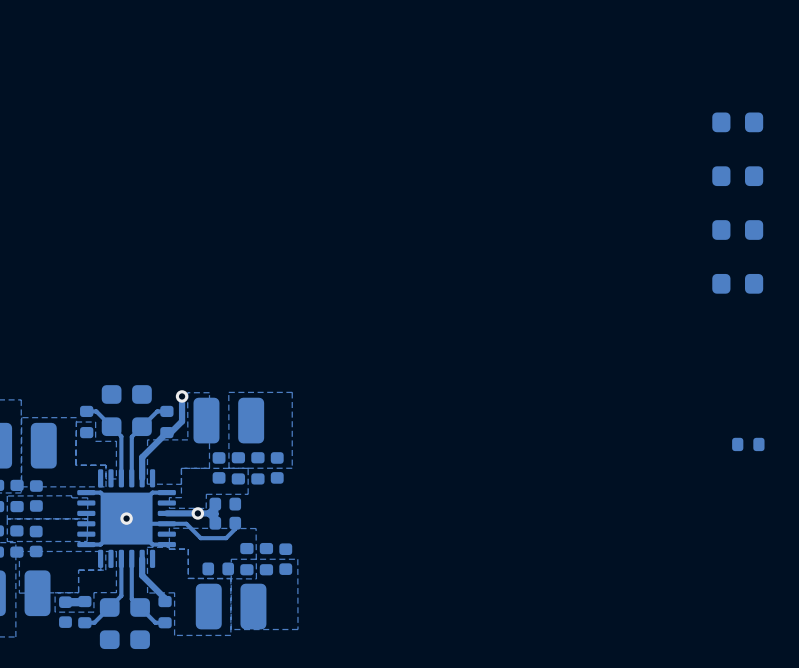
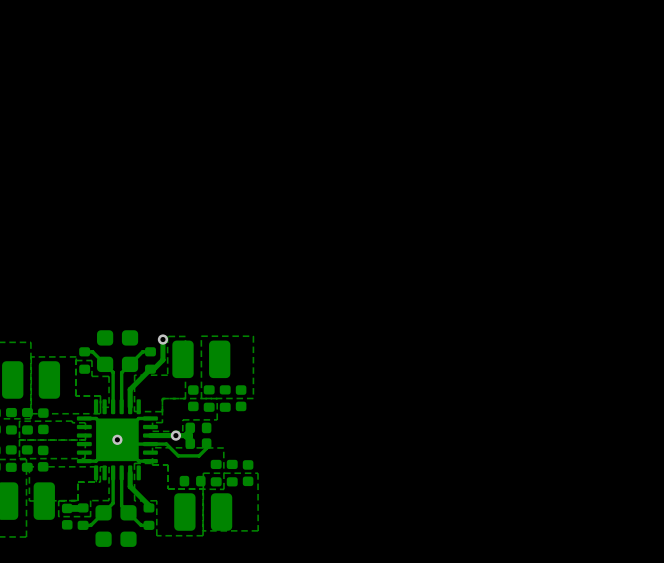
part: (737, 122) -> none
part: (737, 176) -> none
part: (737, 230) -> none
part: (737, 283) -> none
part: (748, 444) -> none

